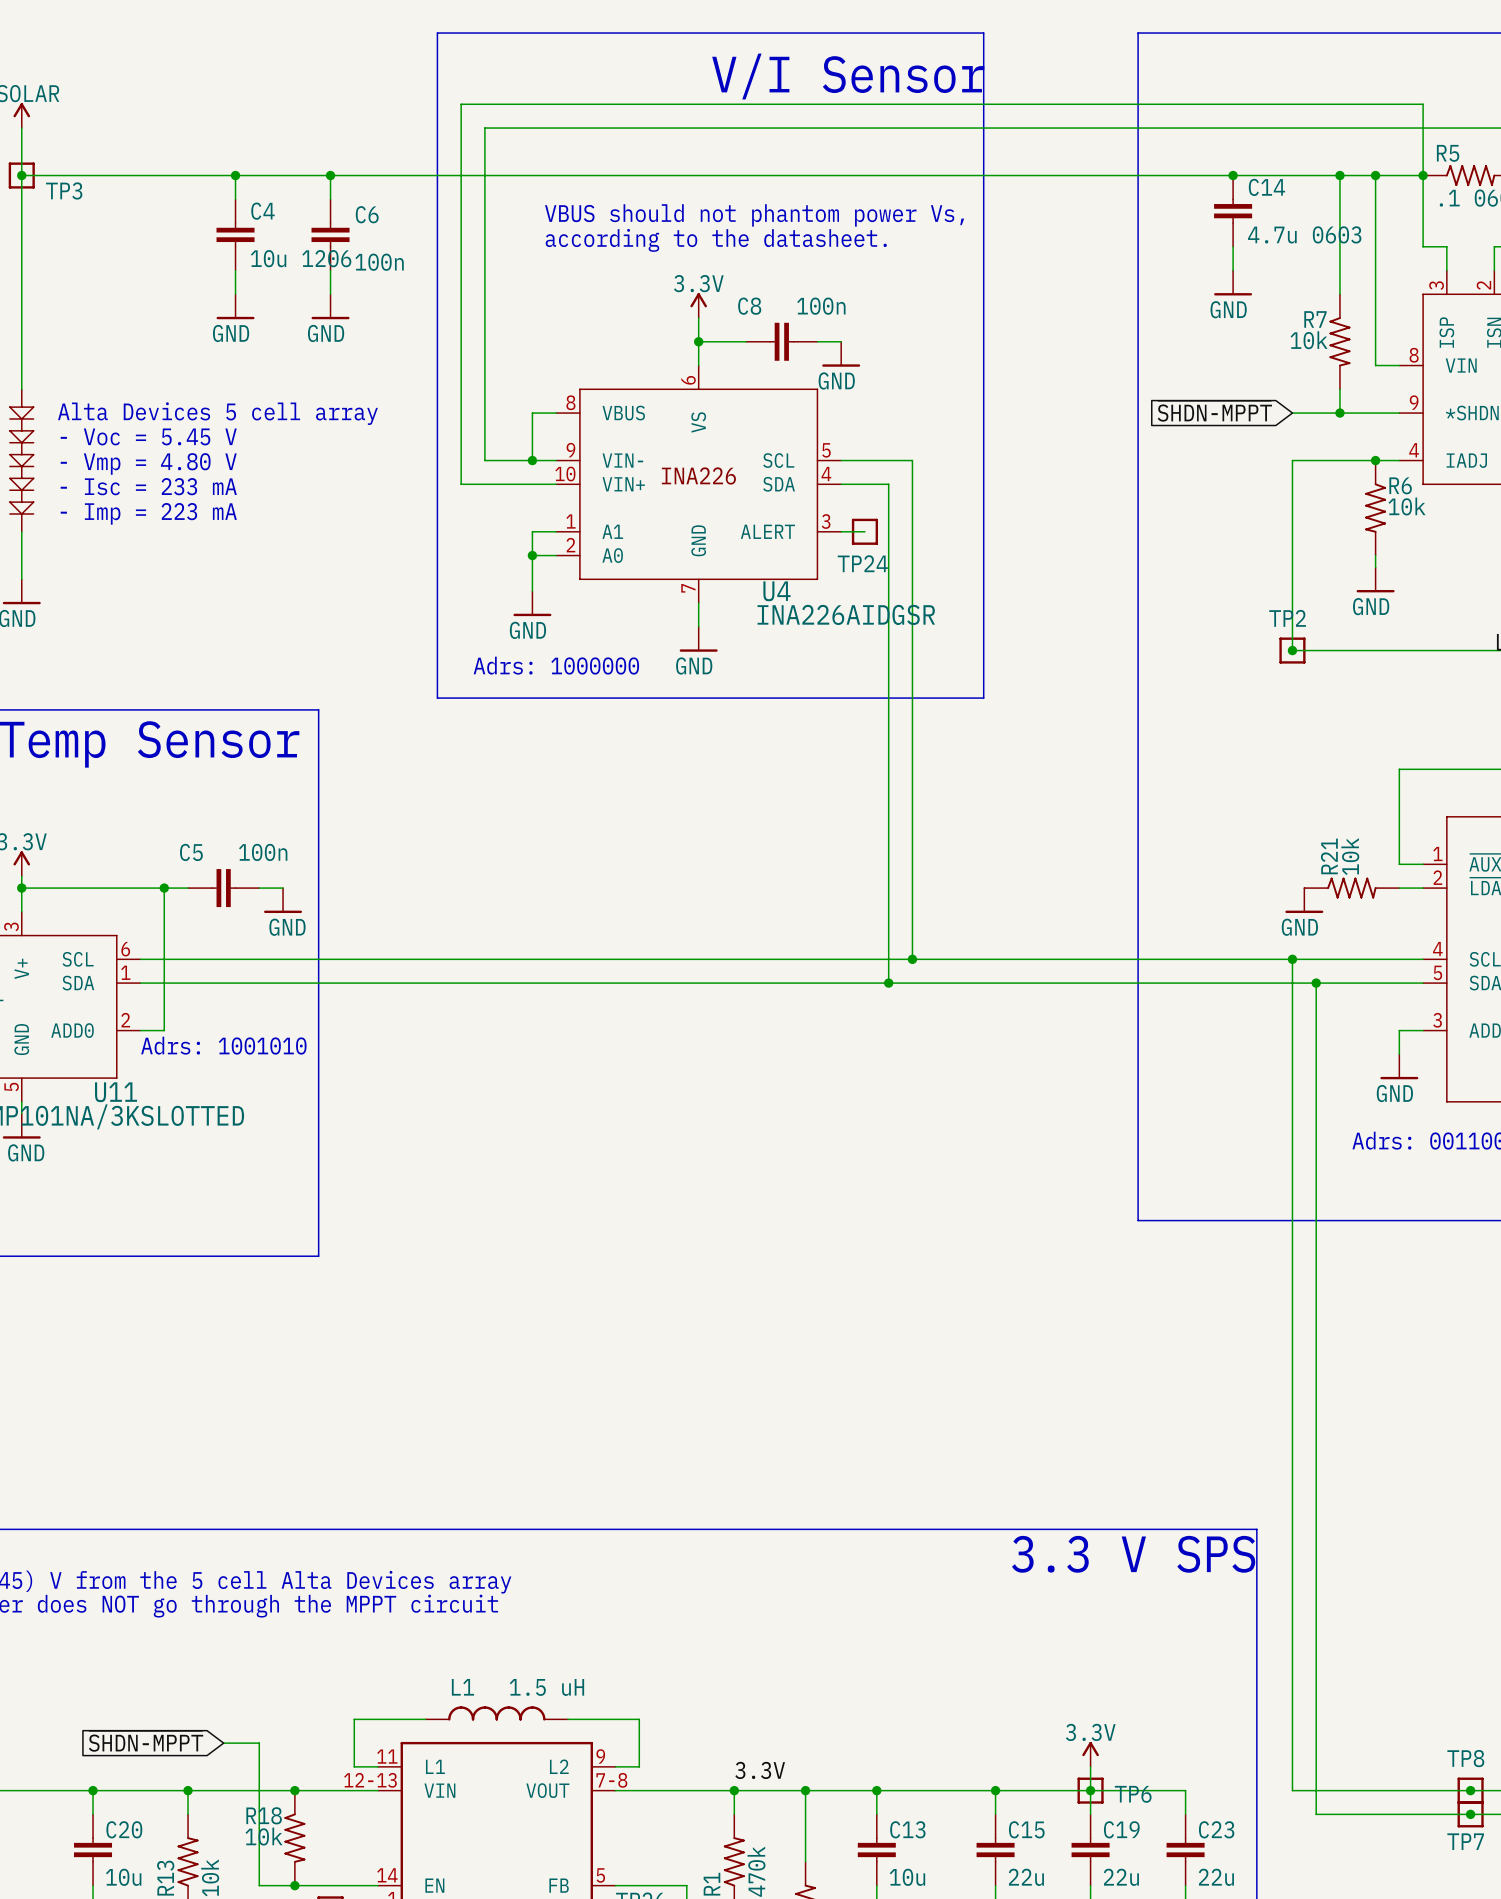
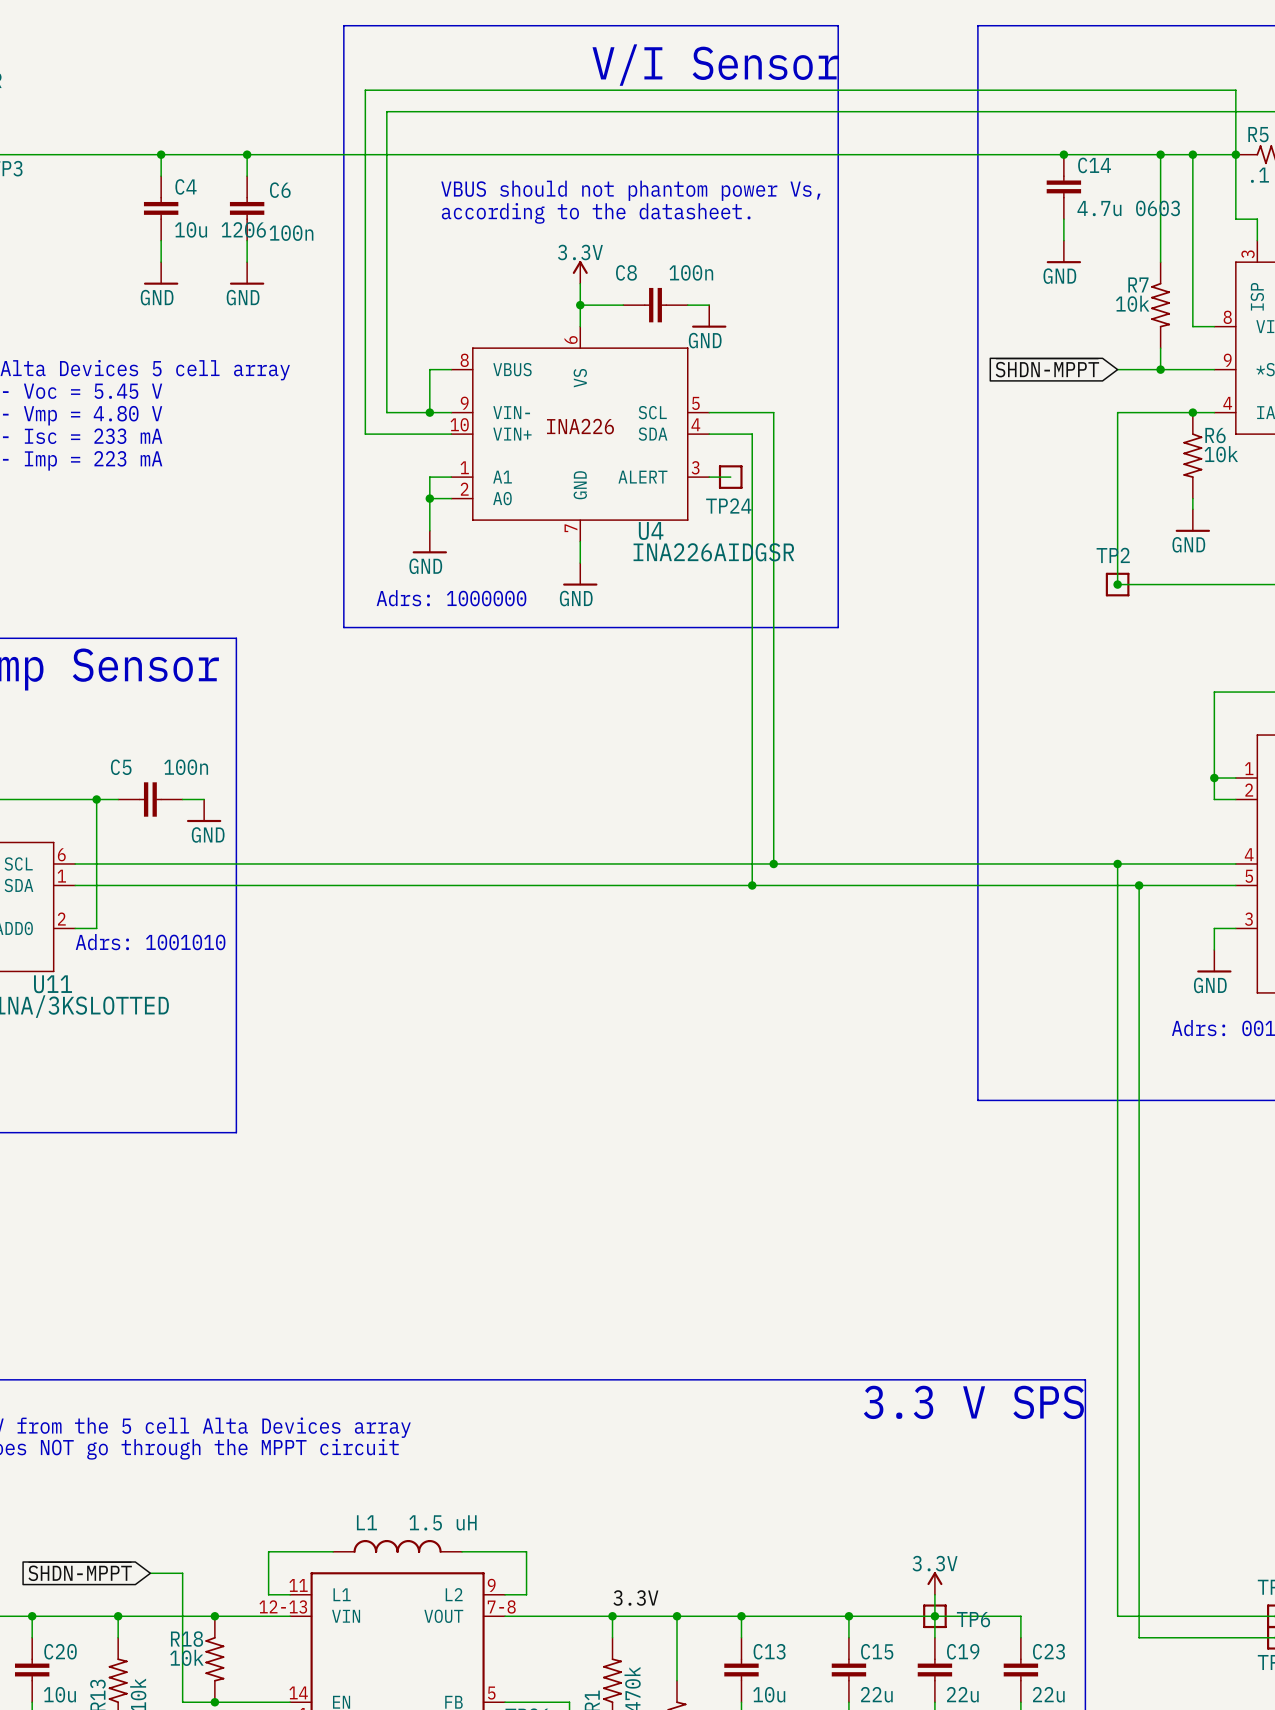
wire: none -> (1214, 778) (1214, 799)
junction: none -> (1214, 778)
R21: 10k (1351, 888) -> none
power symbol: GND (1304, 900) -> none

